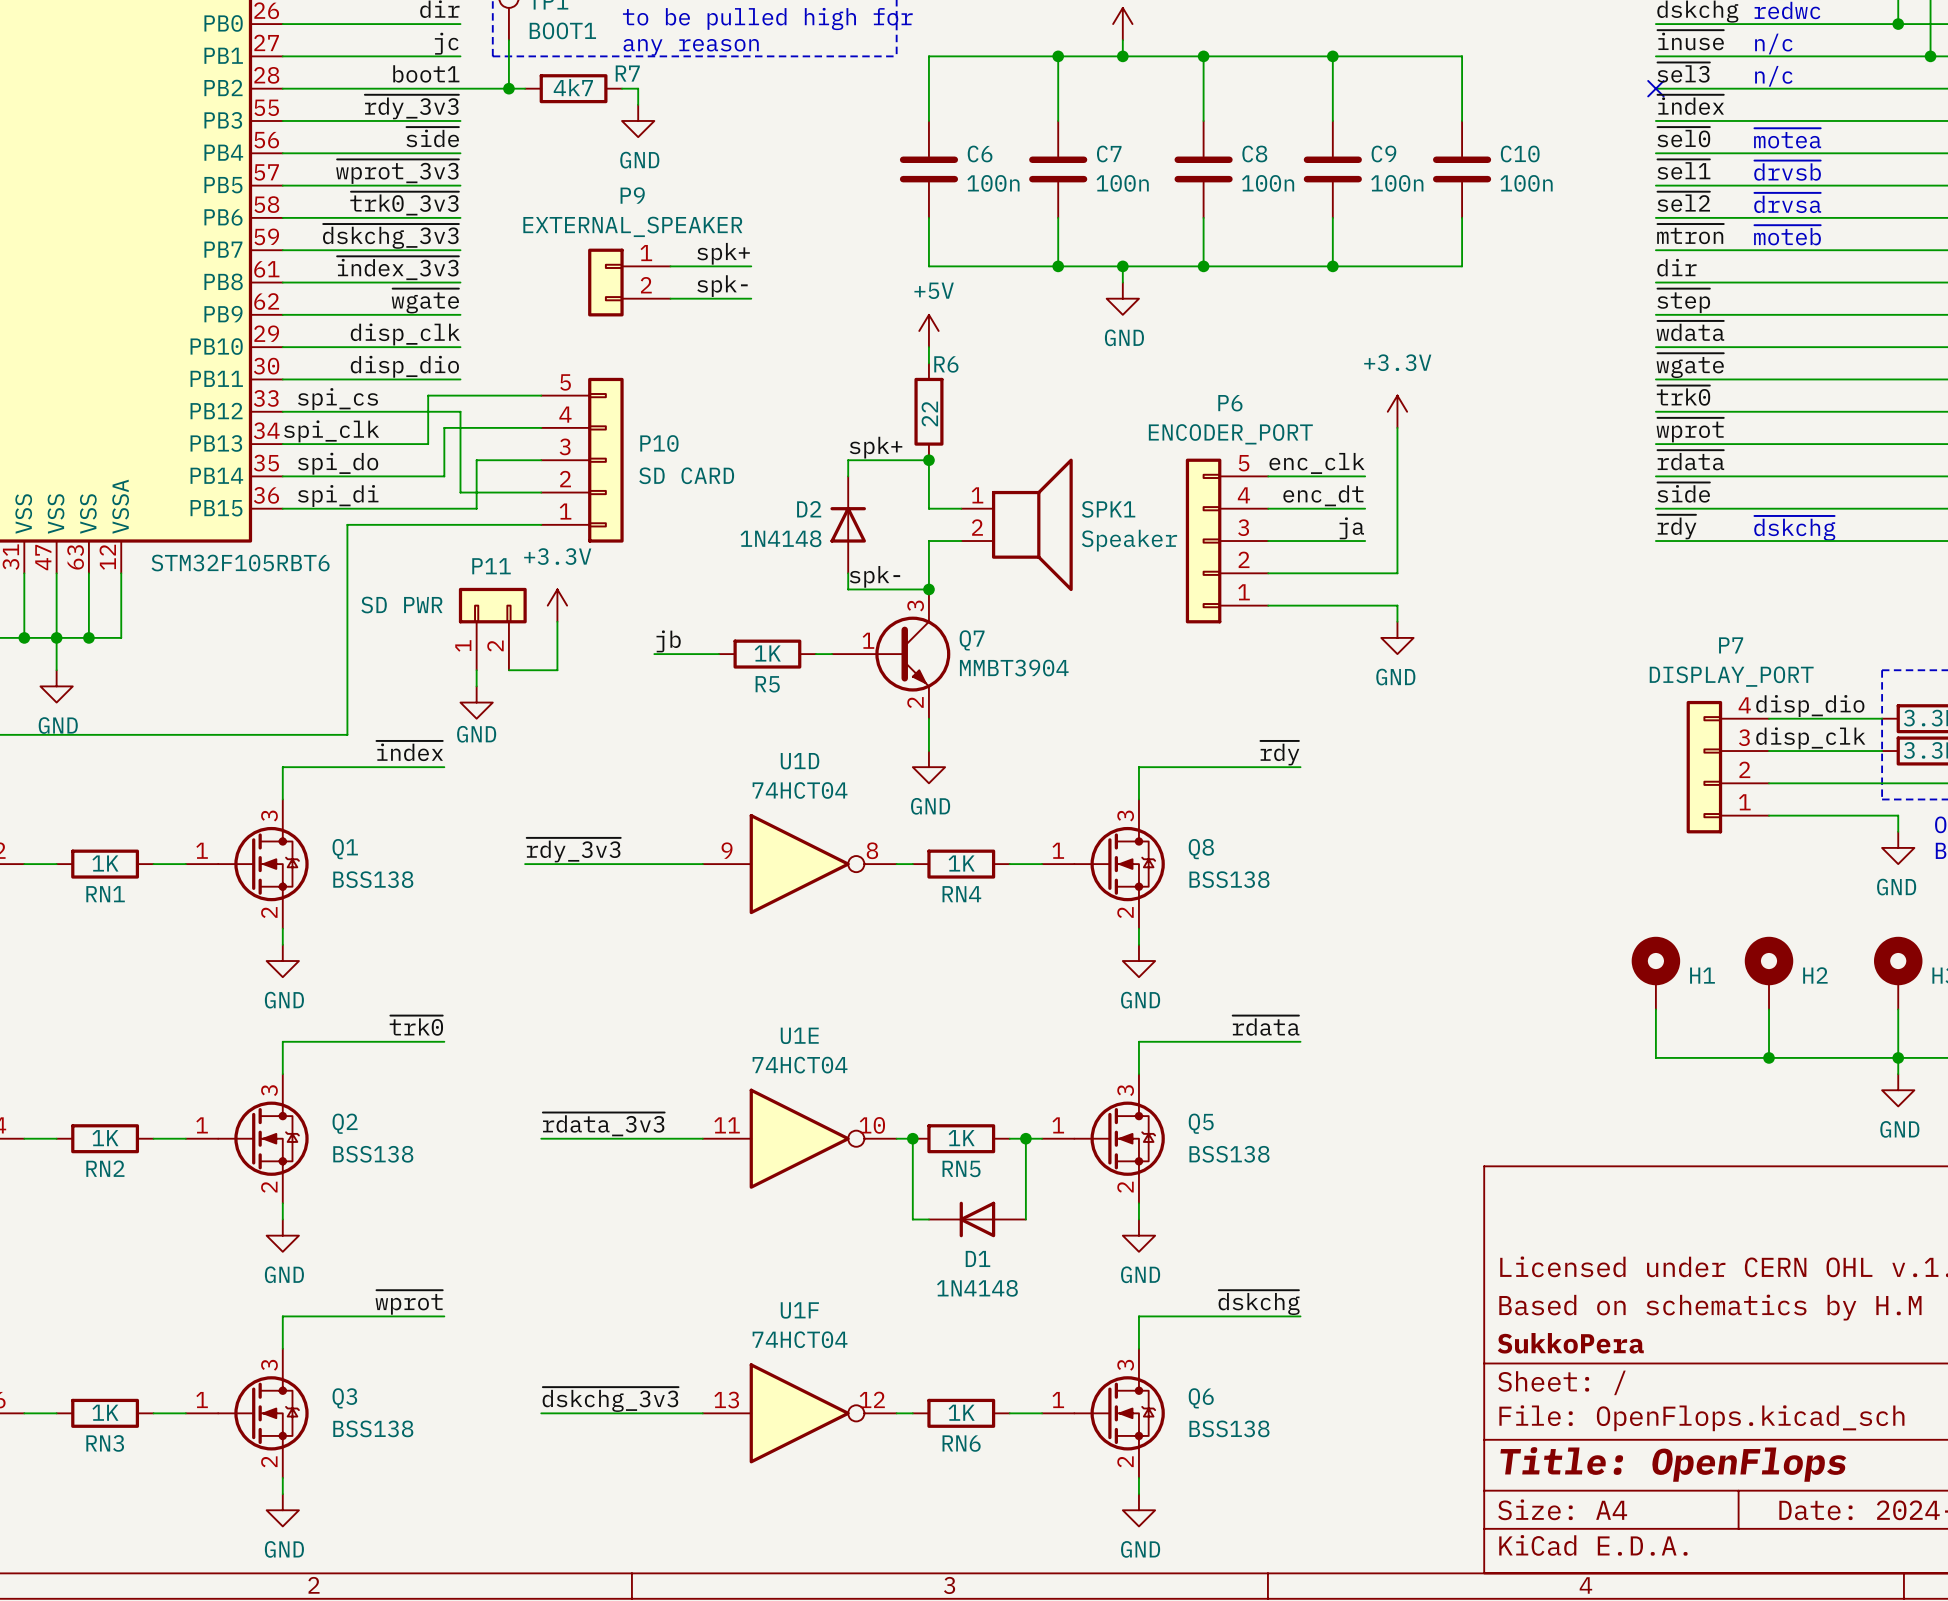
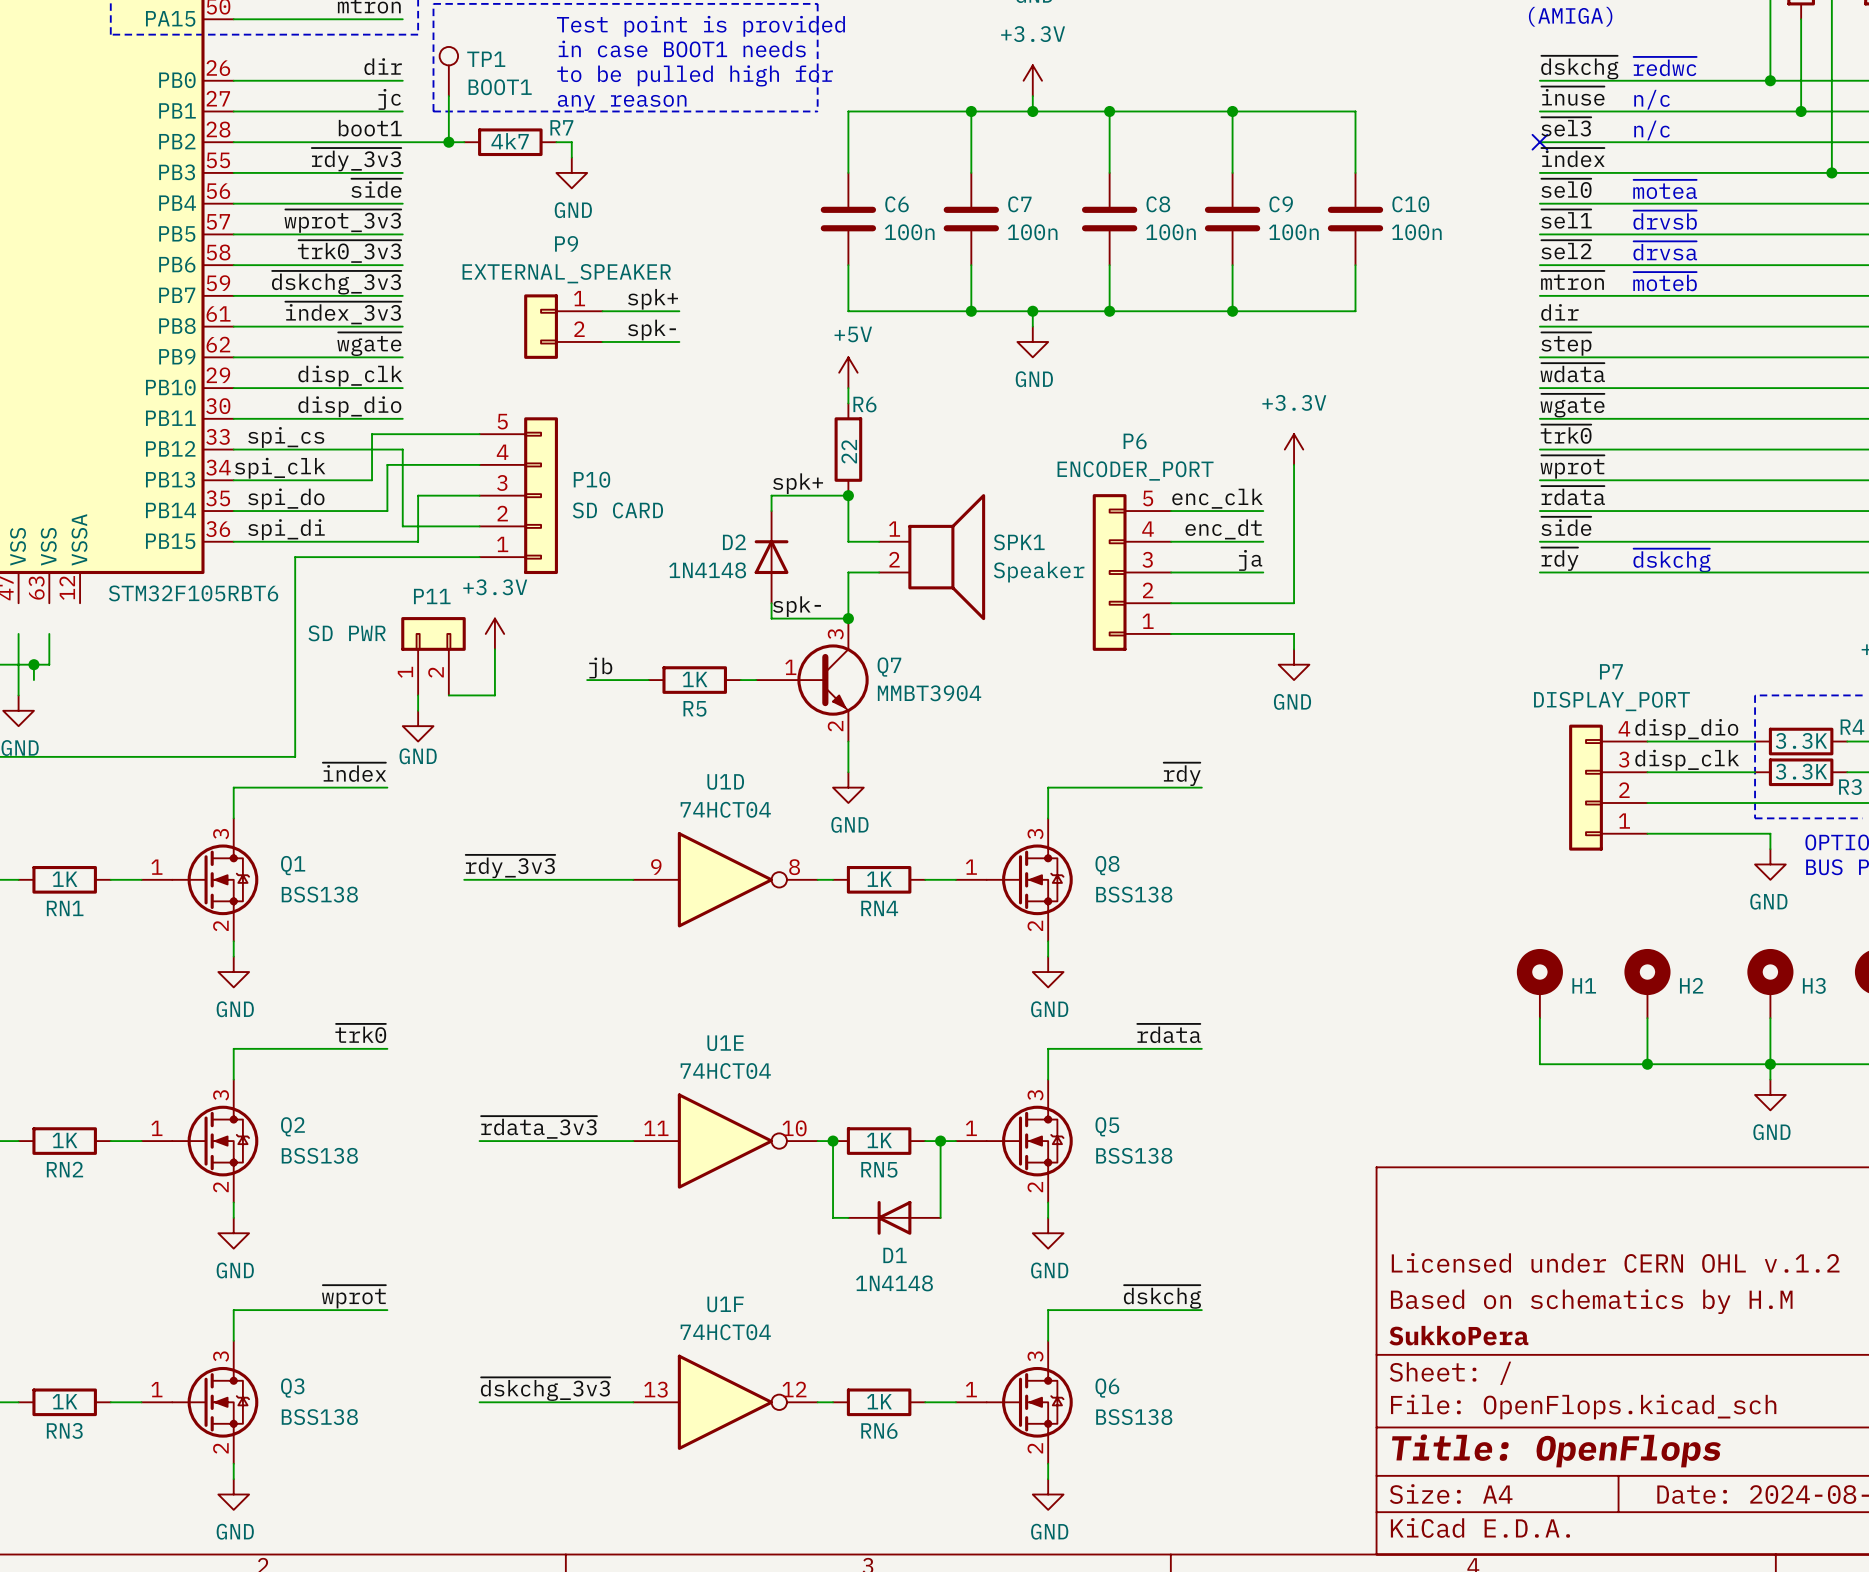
wire: (56, 573) (56, 605) -> none
wire: (88, 573) (88, 605) -> none
wire: (121, 573) (121, 637) (88, 637) -> none
junction: (56, 637) -> none
wire: none -> (33, 664) (33, 680)
junction: none -> (33, 664)
junction: (88, 637) -> none

